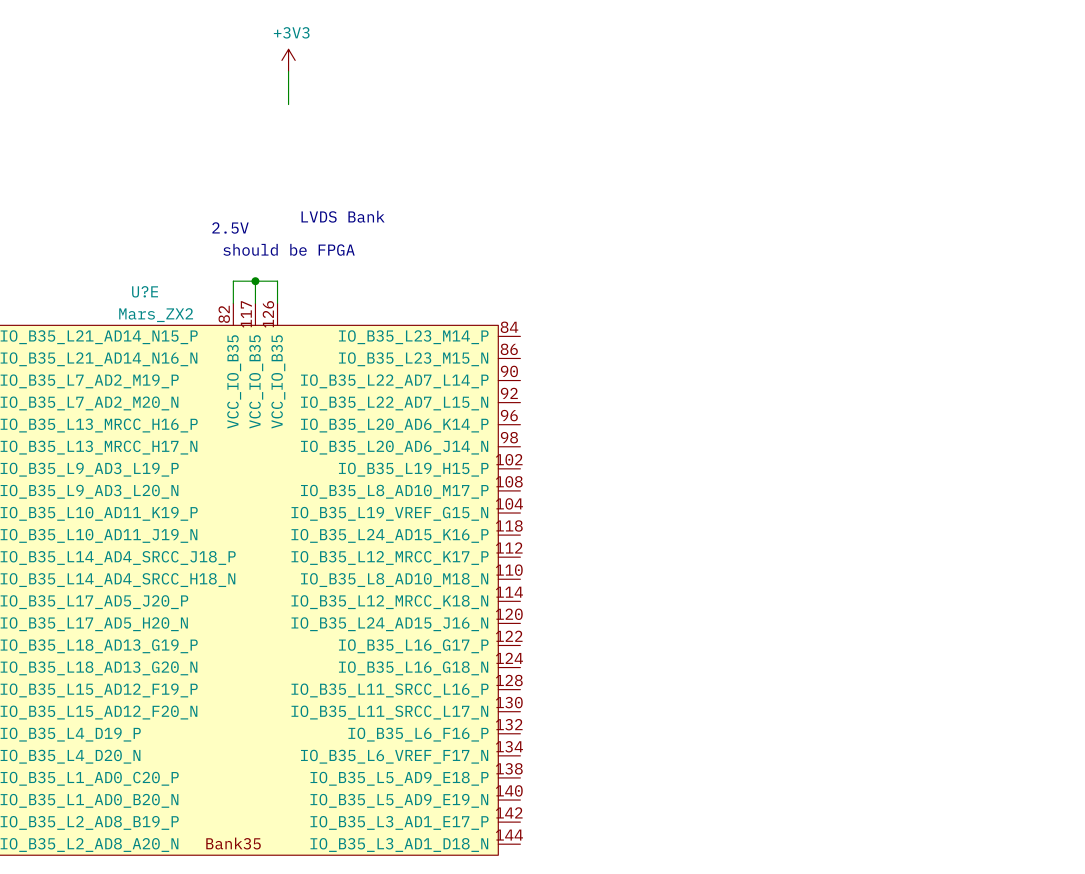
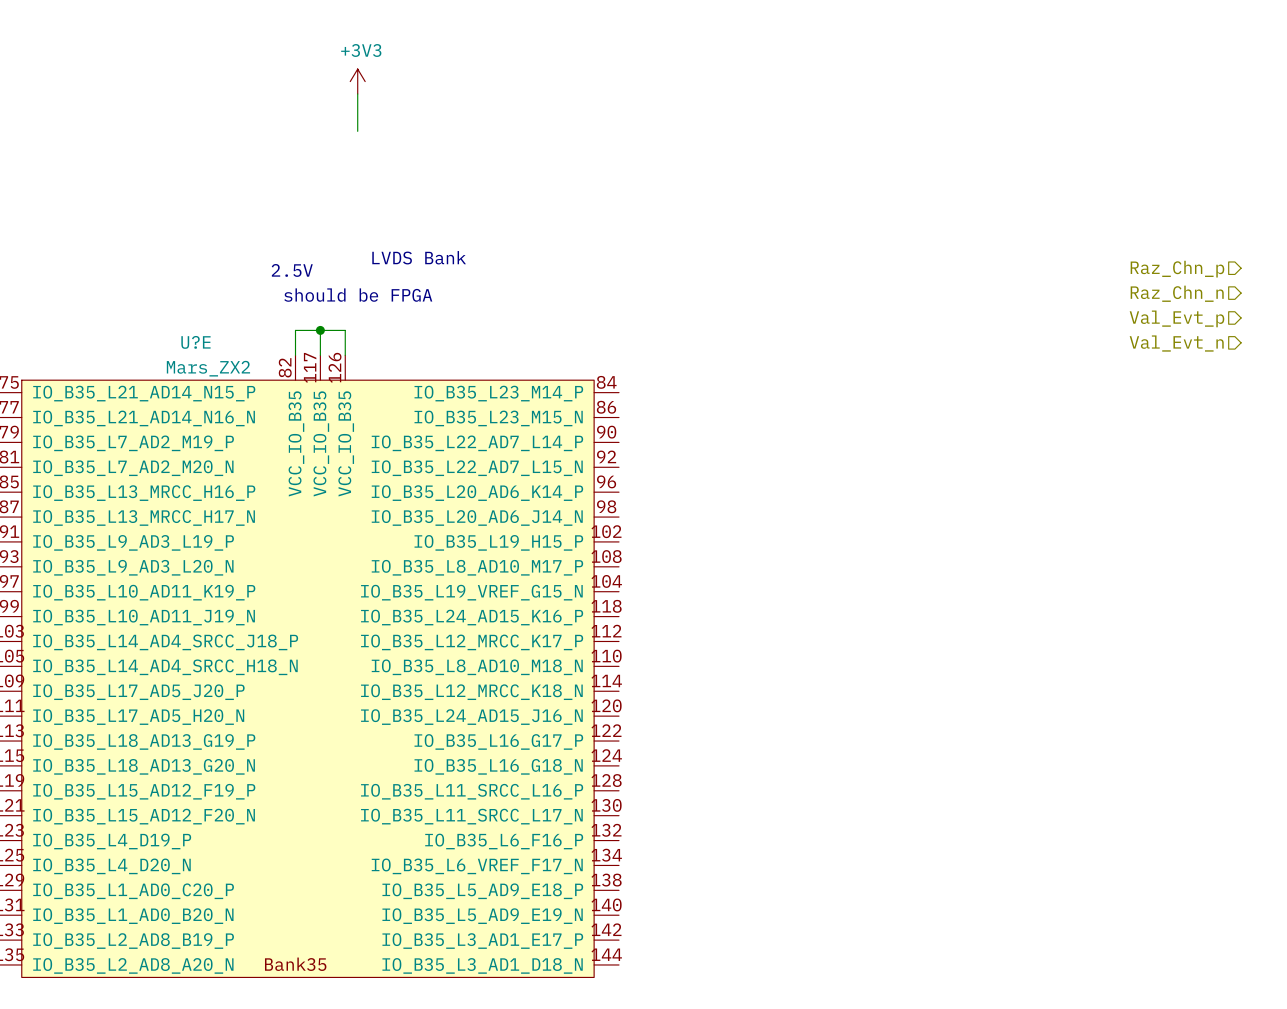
hierarchical label: none -> Raz_Chn_p (1177, 269)
hierarchical label: none -> Raz_Chn_n (1177, 293)
hierarchical label: none -> Val_Evt_p (1176, 318)
hierarchical label: none -> Val_Evt_n (1176, 343)

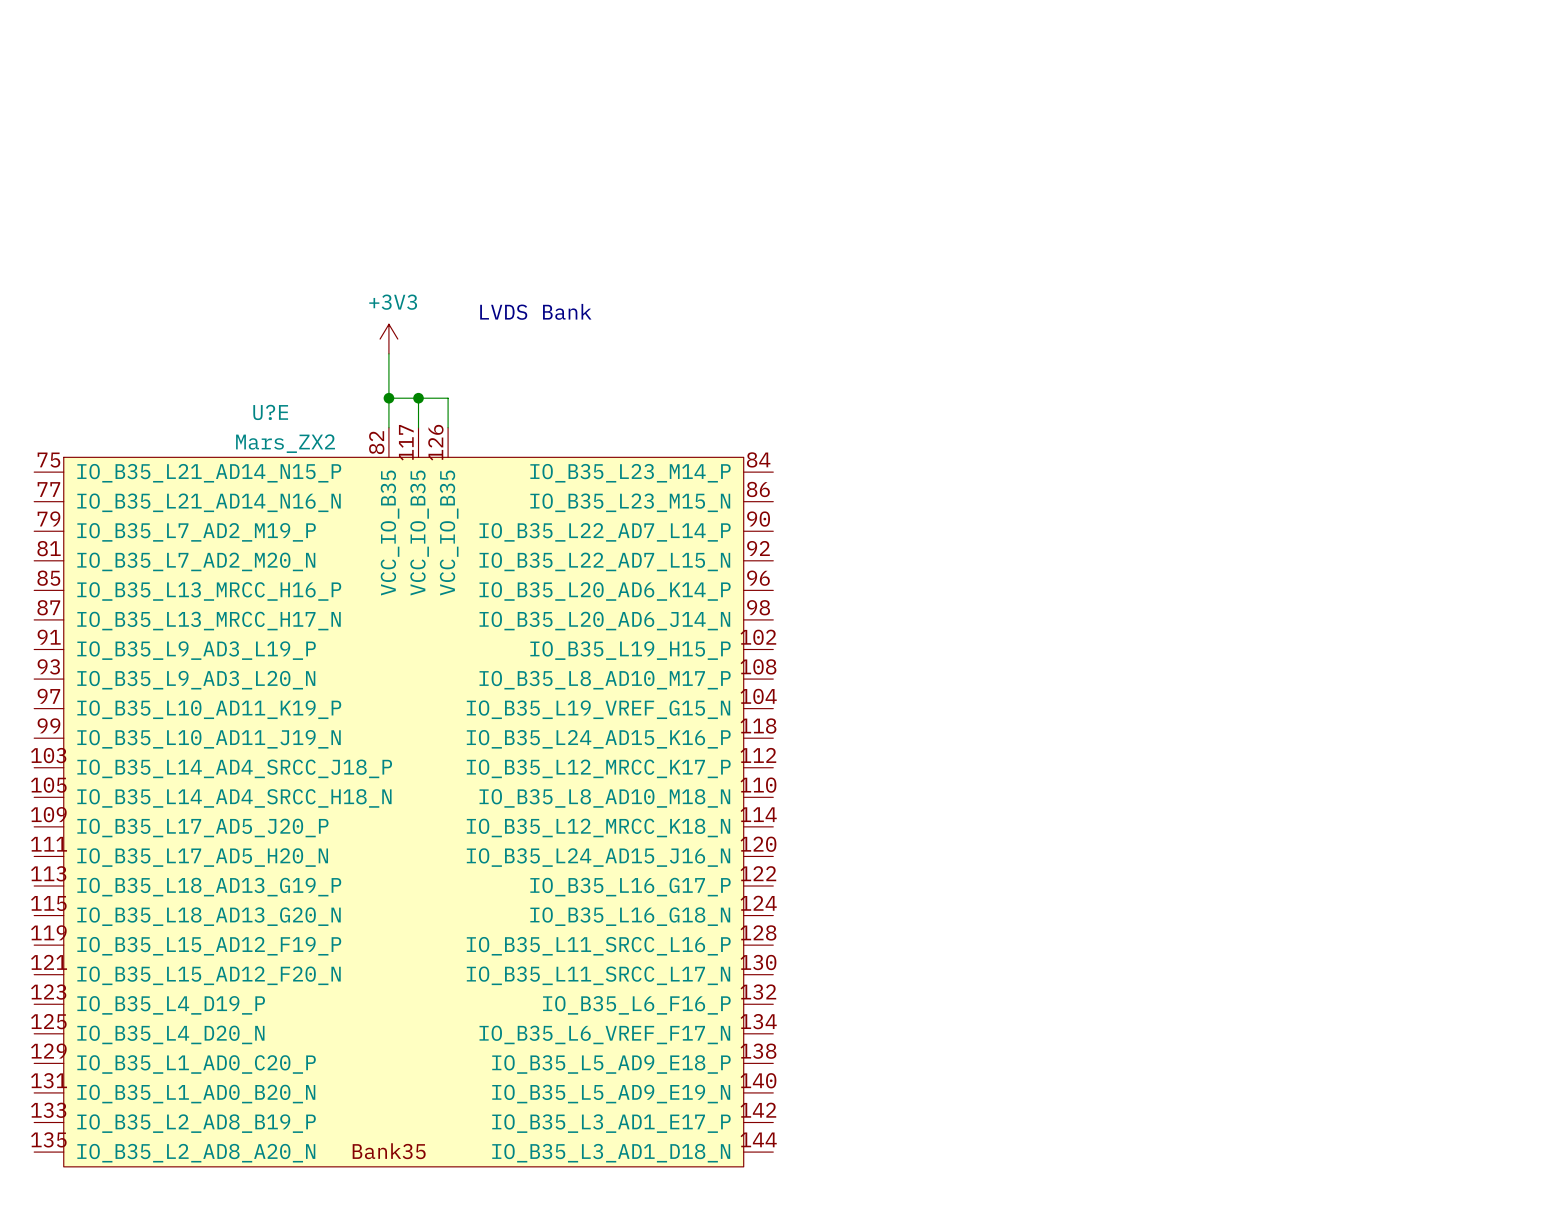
power symbol position: +3V3 (357, 81) -> +3V3 (388, 339)
wire: (357, 94) (357, 131) -> (388, 353) (388, 398)
hierarchical label: Raz_Chn_p (1177, 269) -> none
text: 2.5V (292, 270) -> none
hierarchical label: Raz_Chn_n (1177, 293) -> none
text: should be FPGA (358, 295) -> none
hierarchical label: Val_Evt_p (1176, 318) -> none
junction: none -> (388, 398)
hierarchical label: Val_Evt_n (1176, 343) -> none

